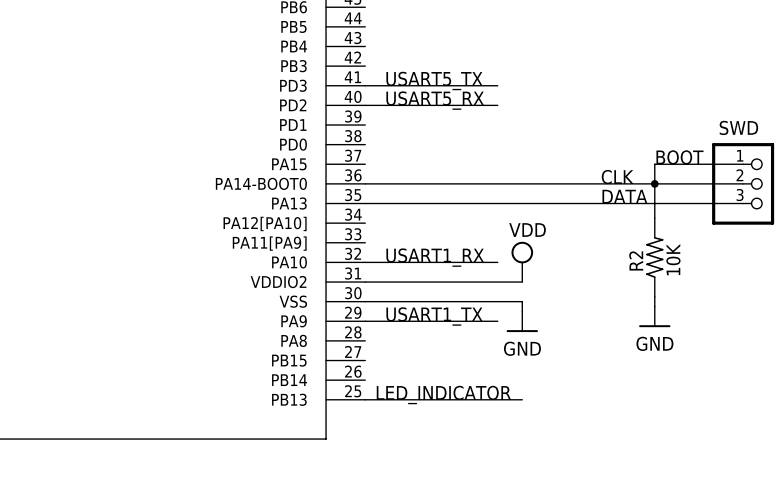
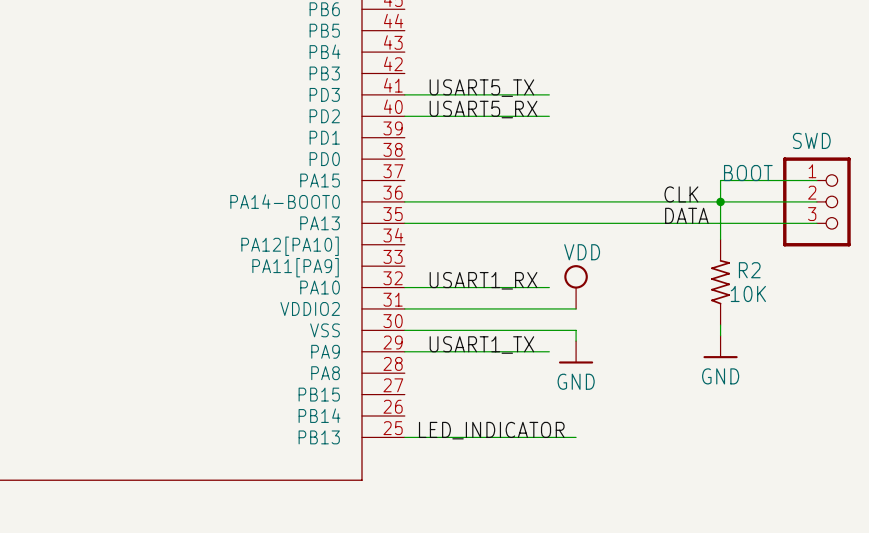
R2 value rotation: 0° (673, 259) -> 90° clockwise (748, 293)
R2 name rotation: 0° (636, 260) -> 90° clockwise (749, 270)
R2 name position: R2 (636, 260) -> R2 (749, 270)

